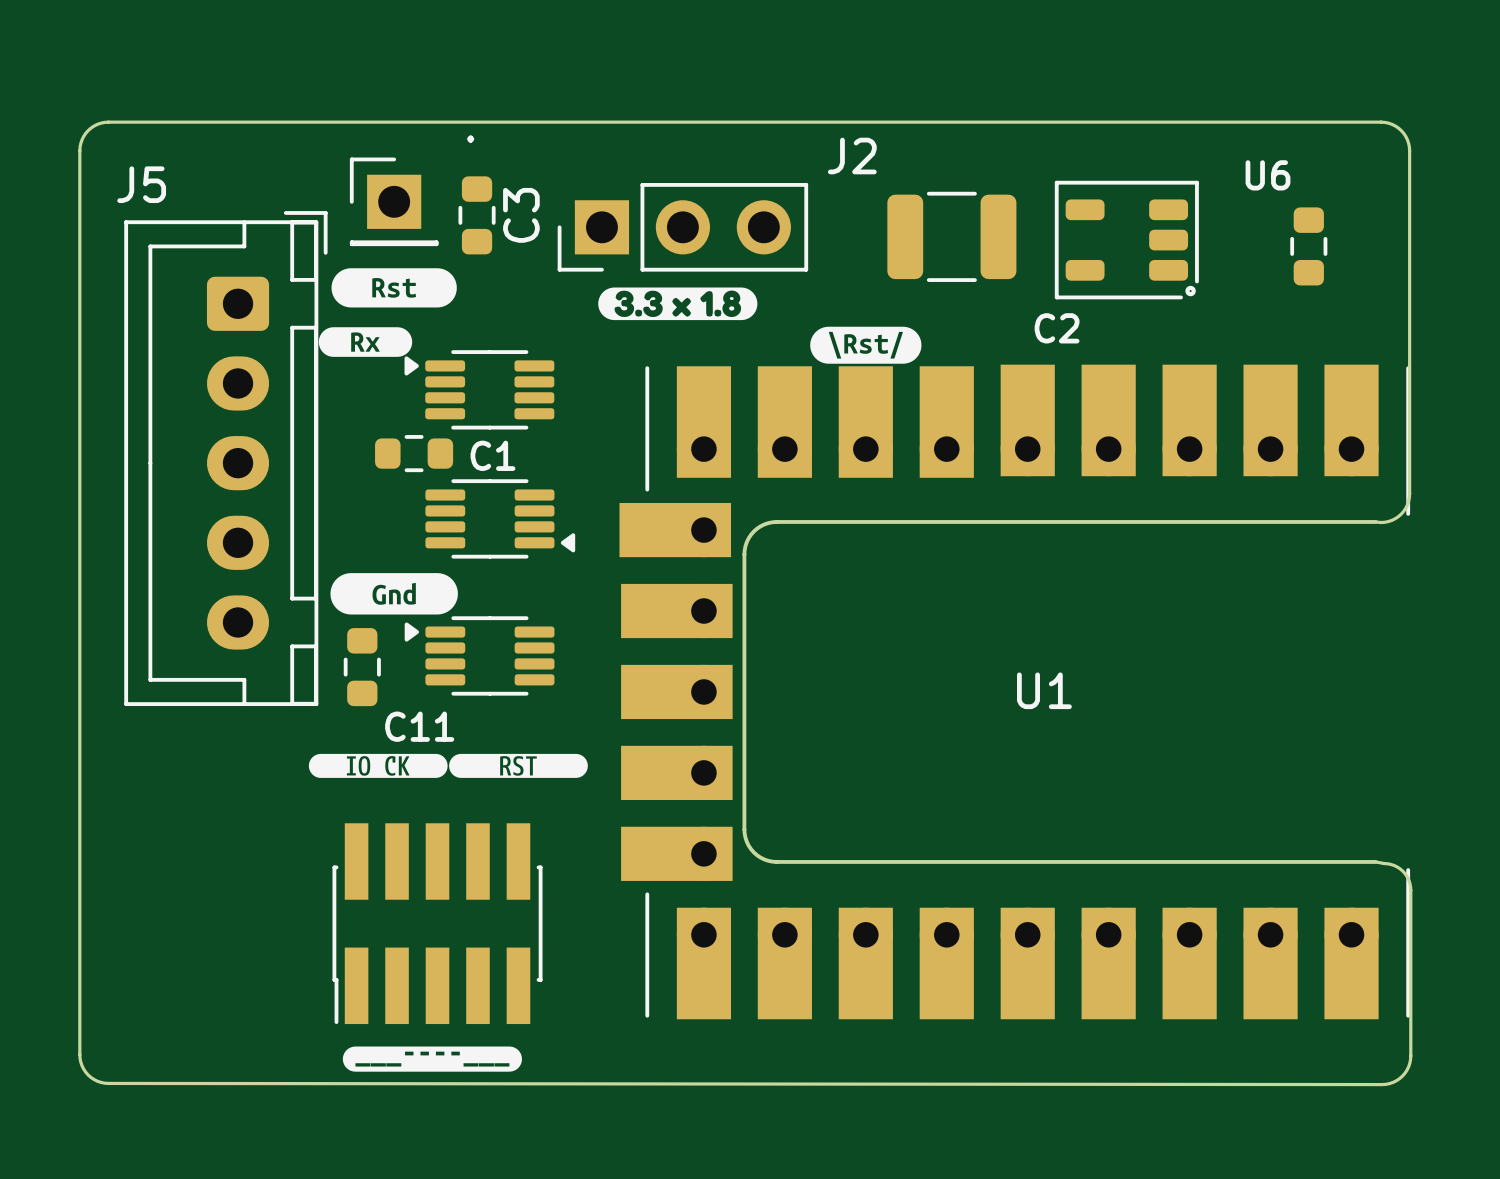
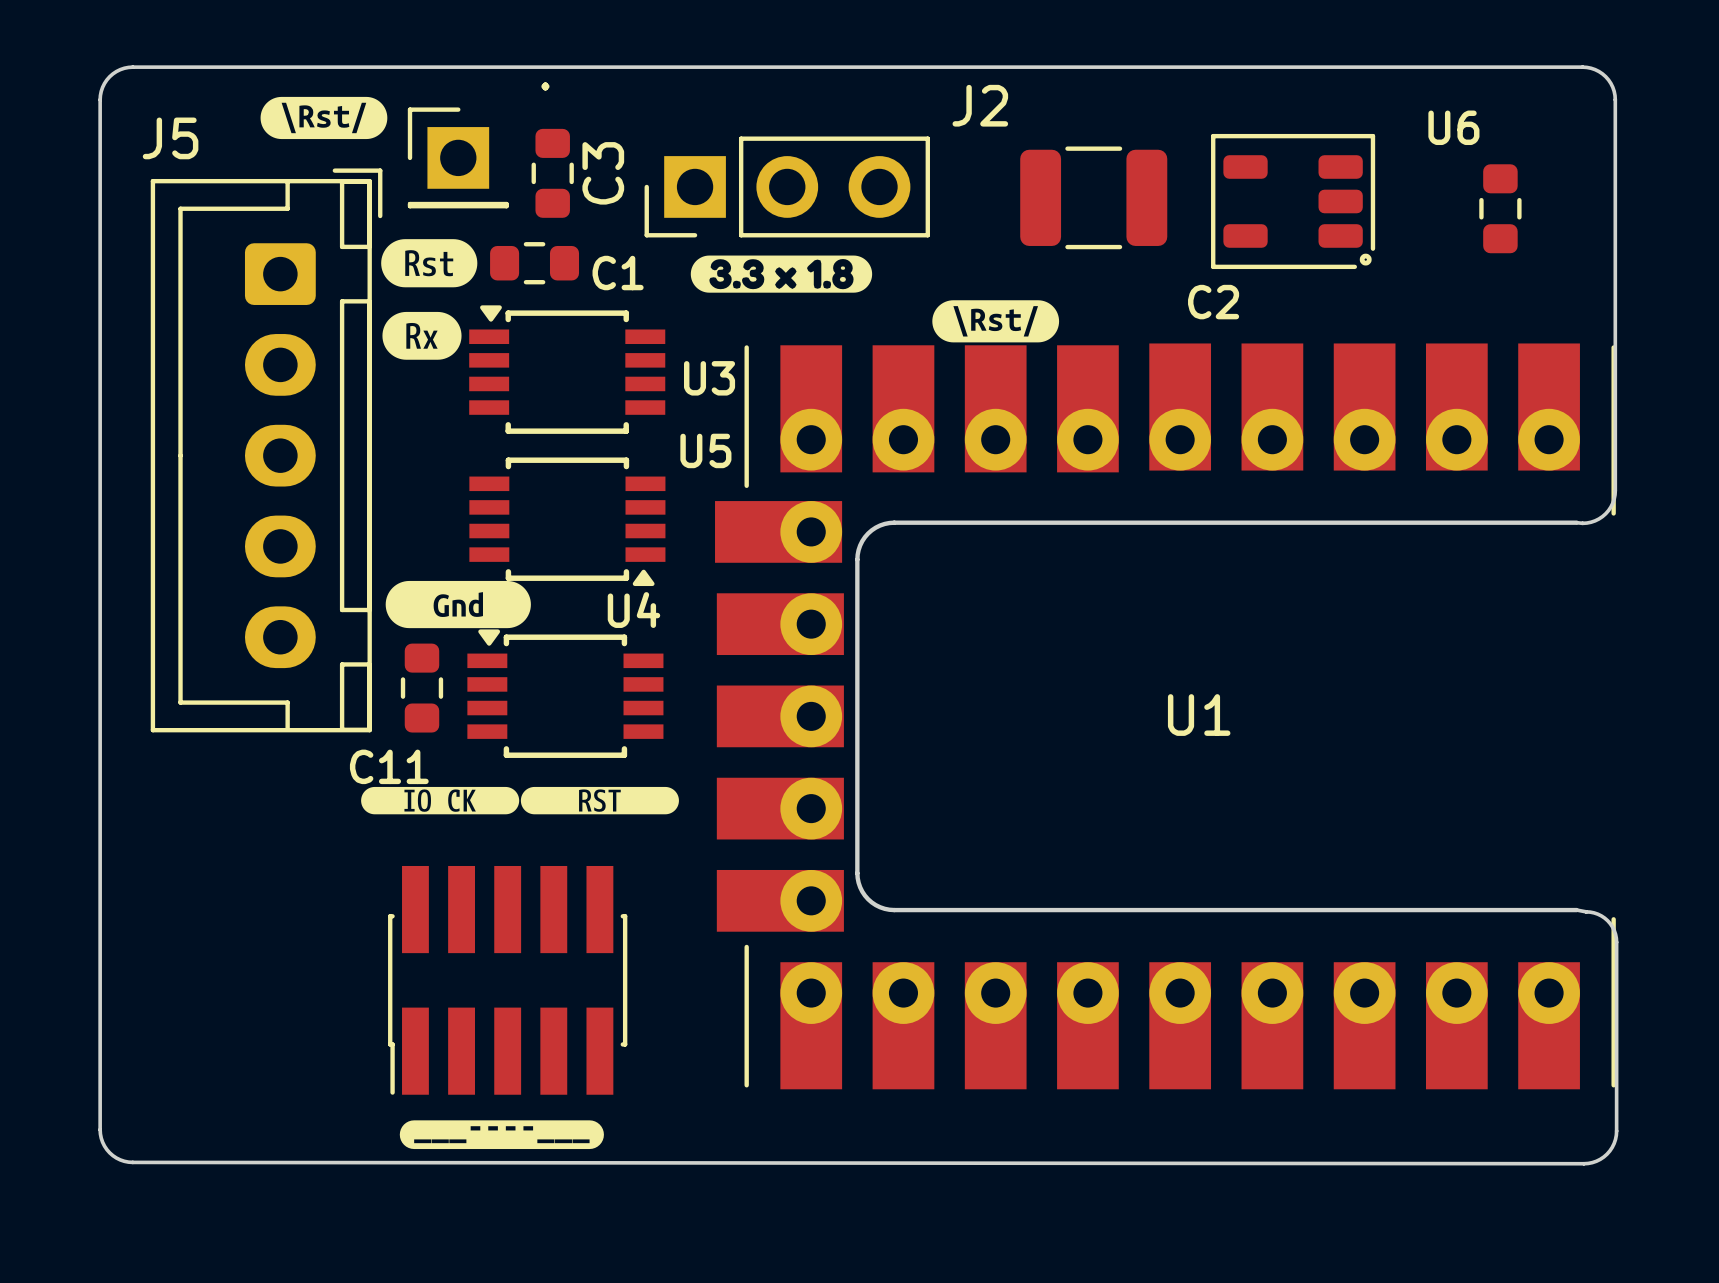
drawing: none -> [260, 96, 388, 140]
drawing shape: [331, 268, 457, 308] -> [381, 239, 478, 288]
drawing shape: [318, 327, 413, 357] -> [382, 311, 462, 360]
U3: none -> (567, 369)
part: (479, 389) -> none
C1 position: (414, 453) -> (534, 263)
C1 name position: C1 (492, 455) -> C1 (618, 273)
part: (500, 518) -> none
U5: none -> (567, 521)
part: (479, 655) -> none
U4: none -> (565, 693)
C11 name position: C11 (419, 726) -> C11 (389, 766)

